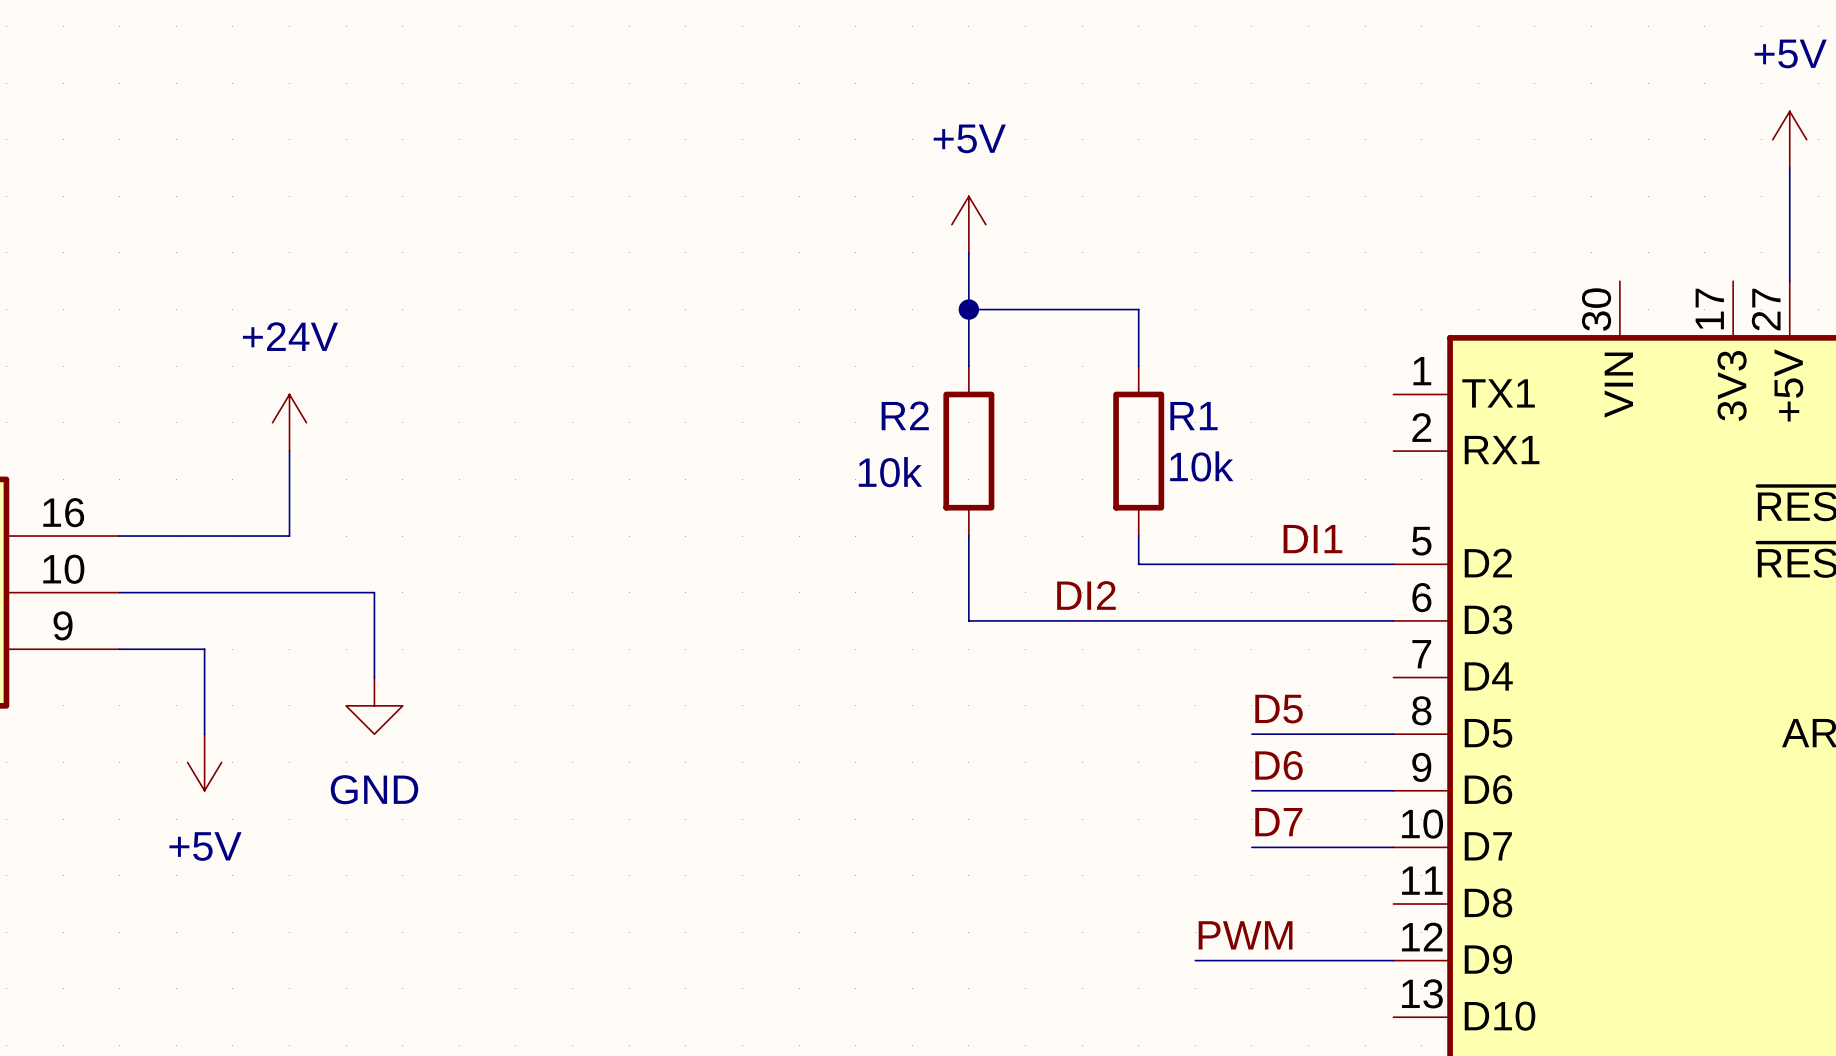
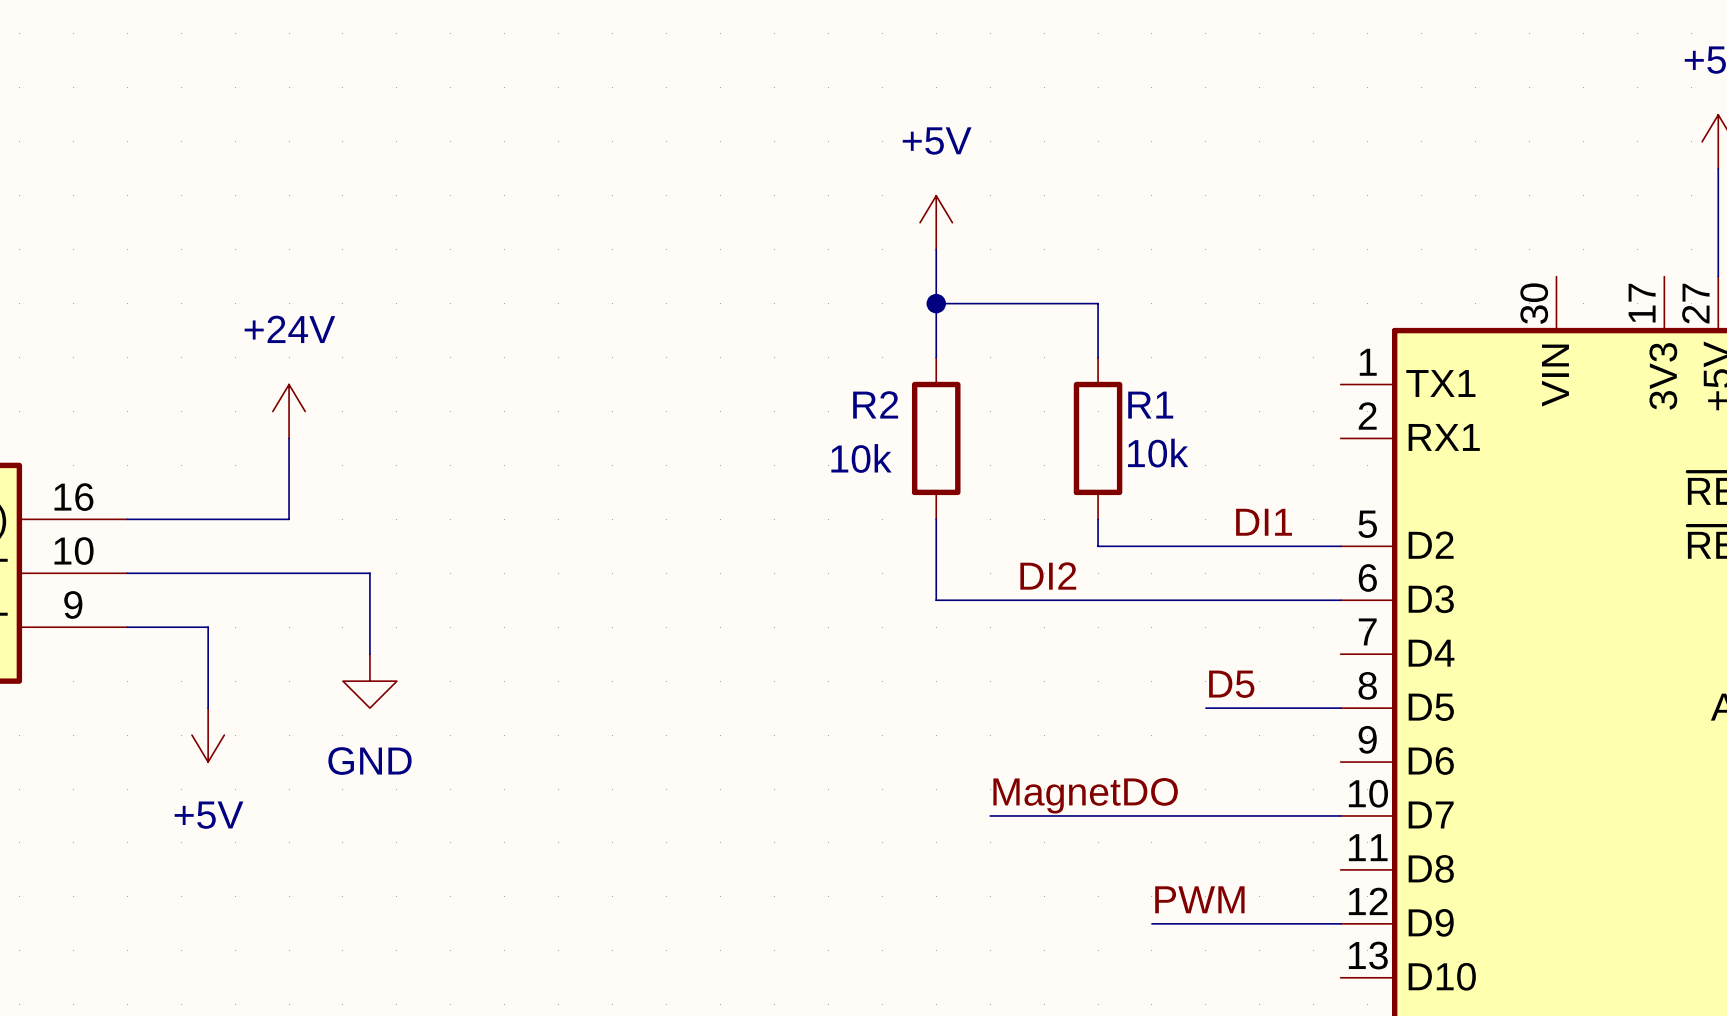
label: D6 (1279, 765) -> none
wire: (1251, 790) (1393, 790) -> none
label: D7 (1278, 822) -> none
label: none -> MagnetDO (1085, 795)
wire: none -> (990, 815) (1205, 815)

